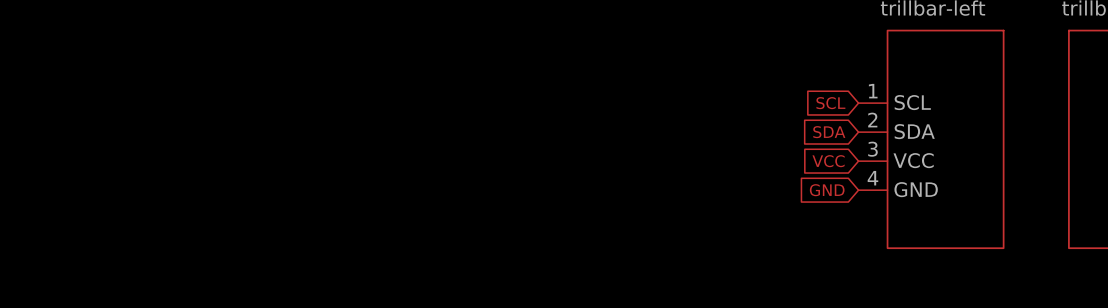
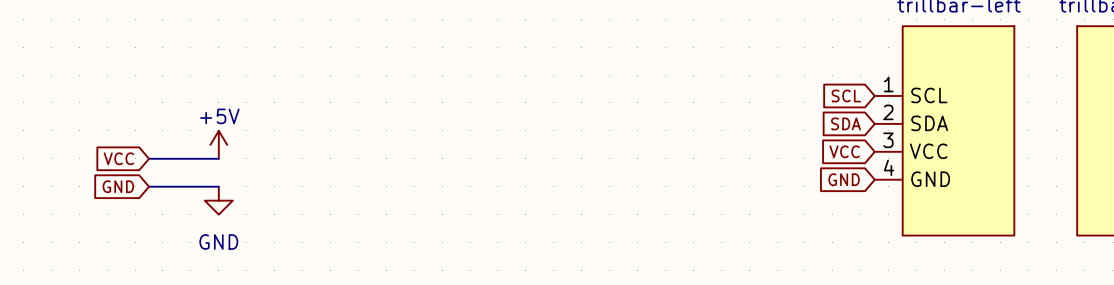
power symbol: none -> +5V (218, 144)
global label: none -> VCC (118, 158)
wire: none -> (149, 158) (218, 158)
global label: none -> GND (118, 186)
wire: none -> (149, 186) (218, 186)
power symbol: none -> GND (218, 200)

